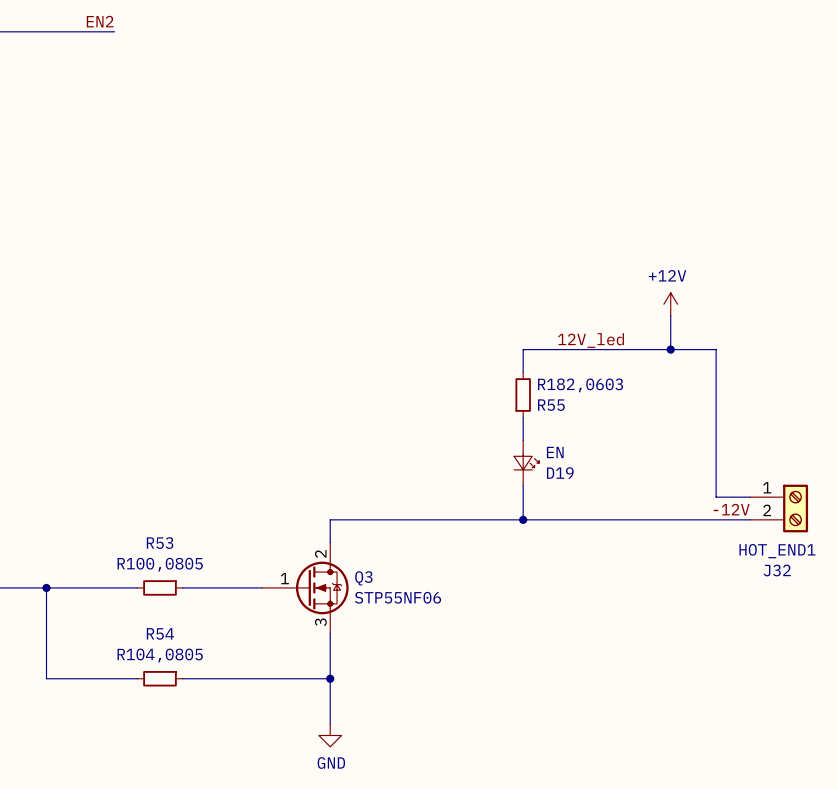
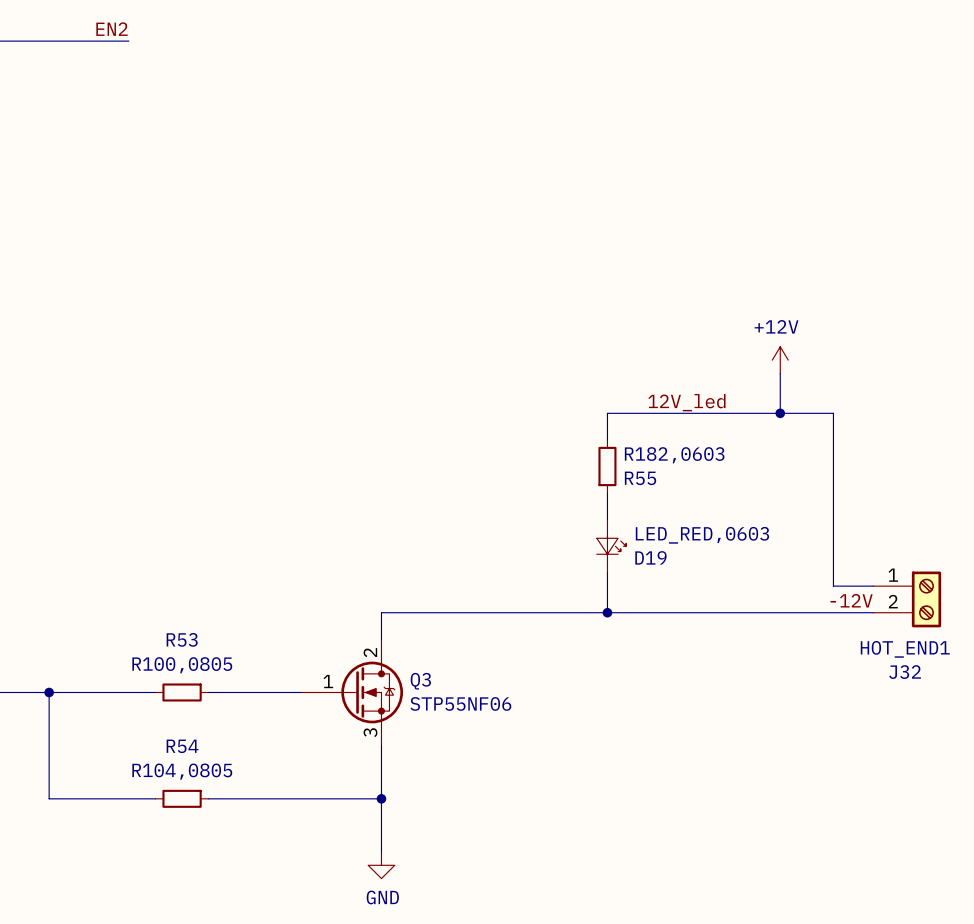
D19 value: EN (555, 452) -> LED_RED,0603 (702, 535)

